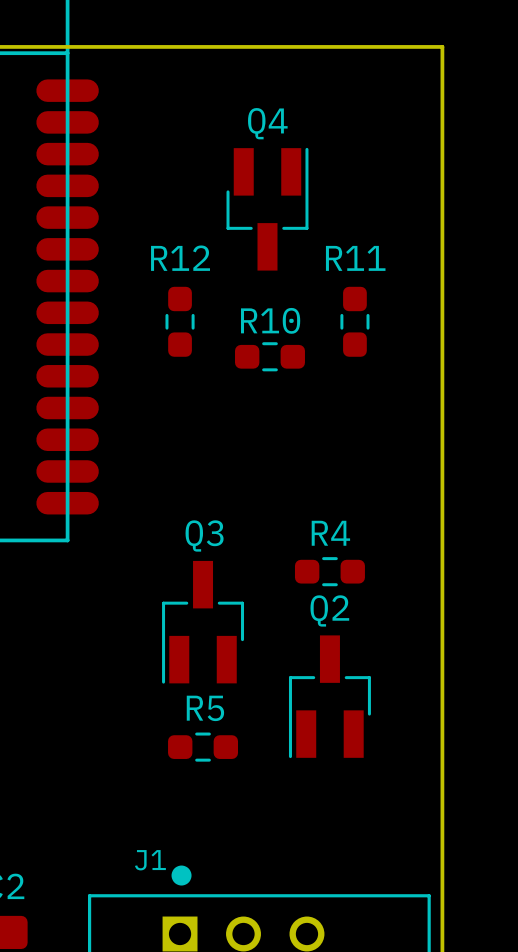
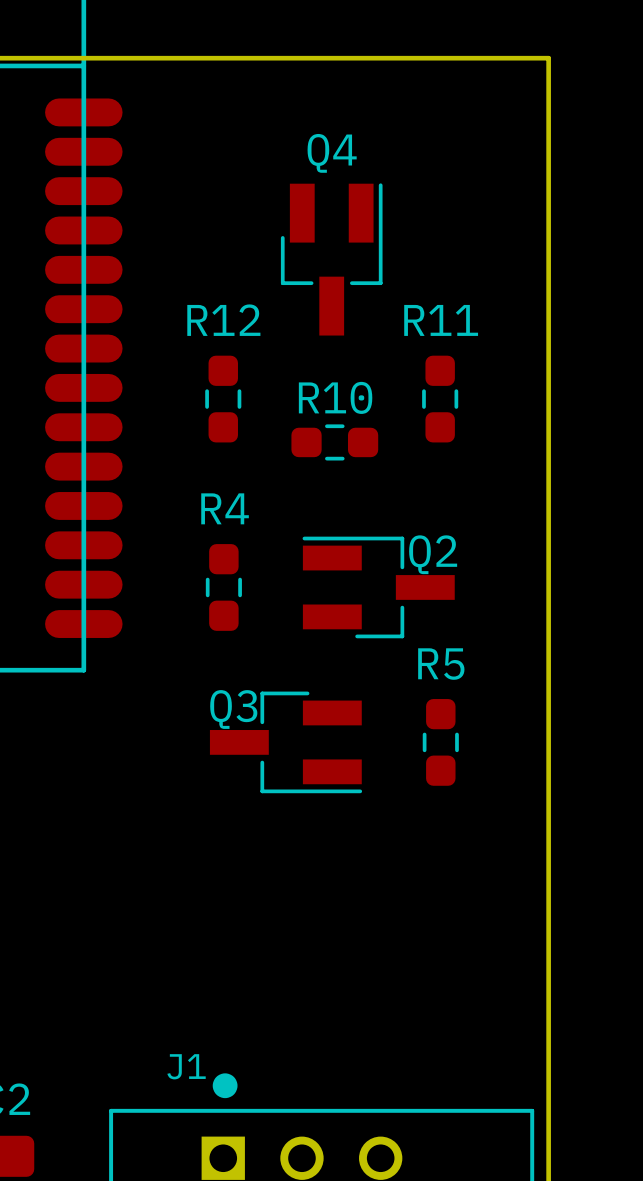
Q3 name position: Q3 (204, 535) -> Q3 (233, 709)
R4 rotation: 0° (329, 571) -> 90° clockwise (223, 587)
R4 position: (329, 571) -> (223, 587)
Q2 name position: Q2 (329, 610) -> Q2 (433, 554)
Q3 rotation: 0° (203, 622) -> 90° counterclockwise (286, 742)
Q2 rotation: 0° (329, 696) -> 90° clockwise (378, 587)
Q2 position: (329, 696) -> (378, 587)
R5 rotation: 0° (203, 747) -> 90° clockwise (440, 742)
R5 position: (203, 747) -> (440, 742)

